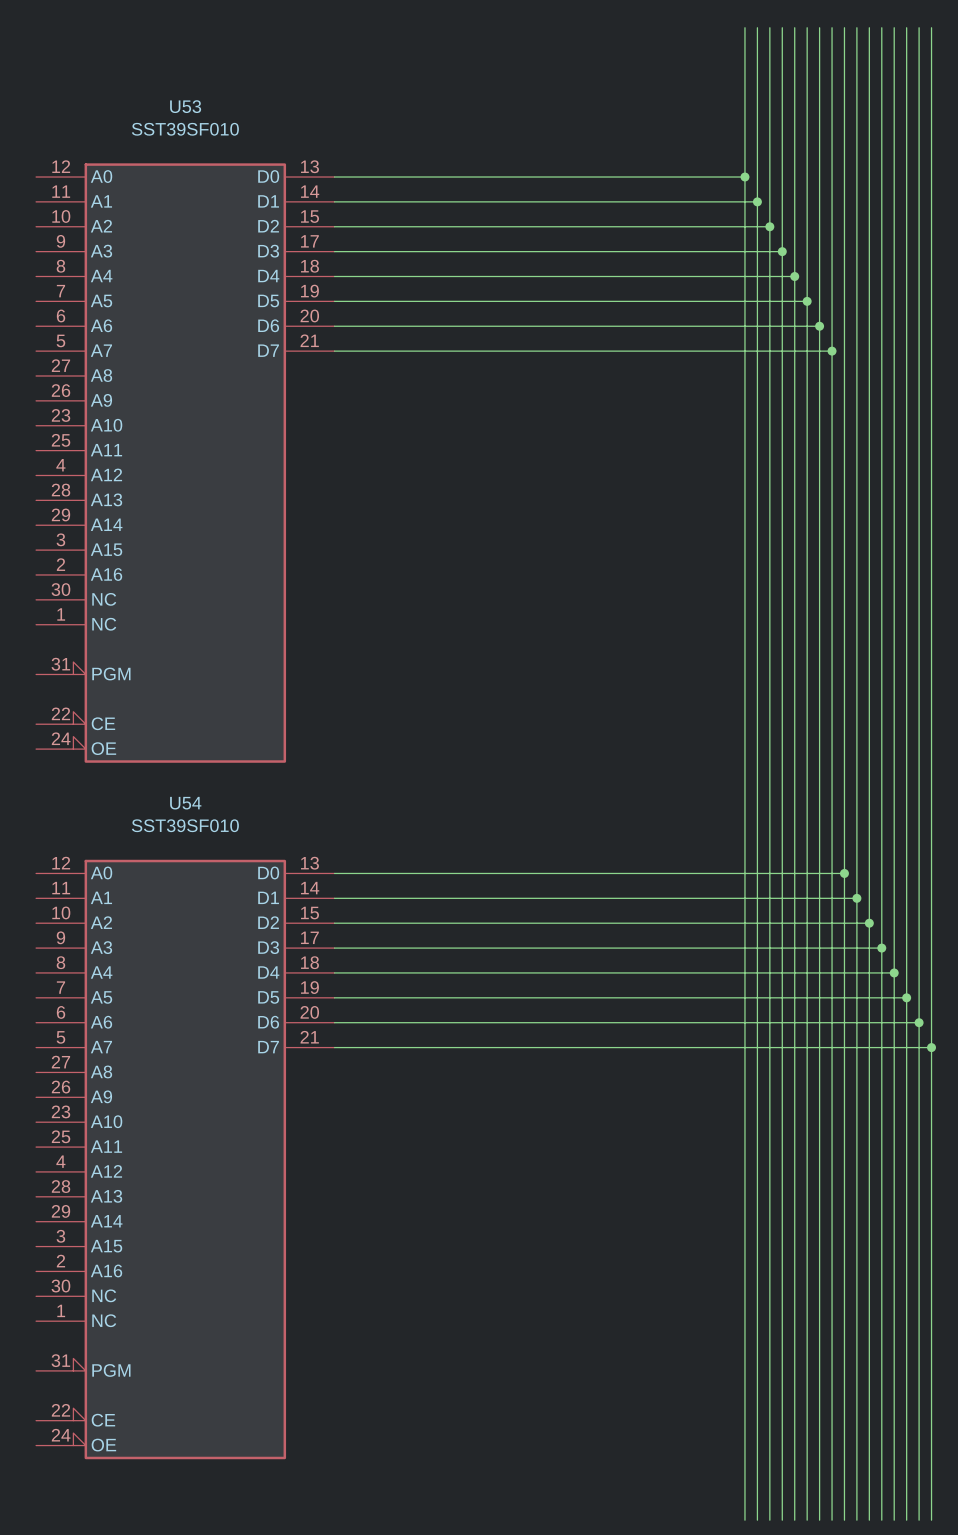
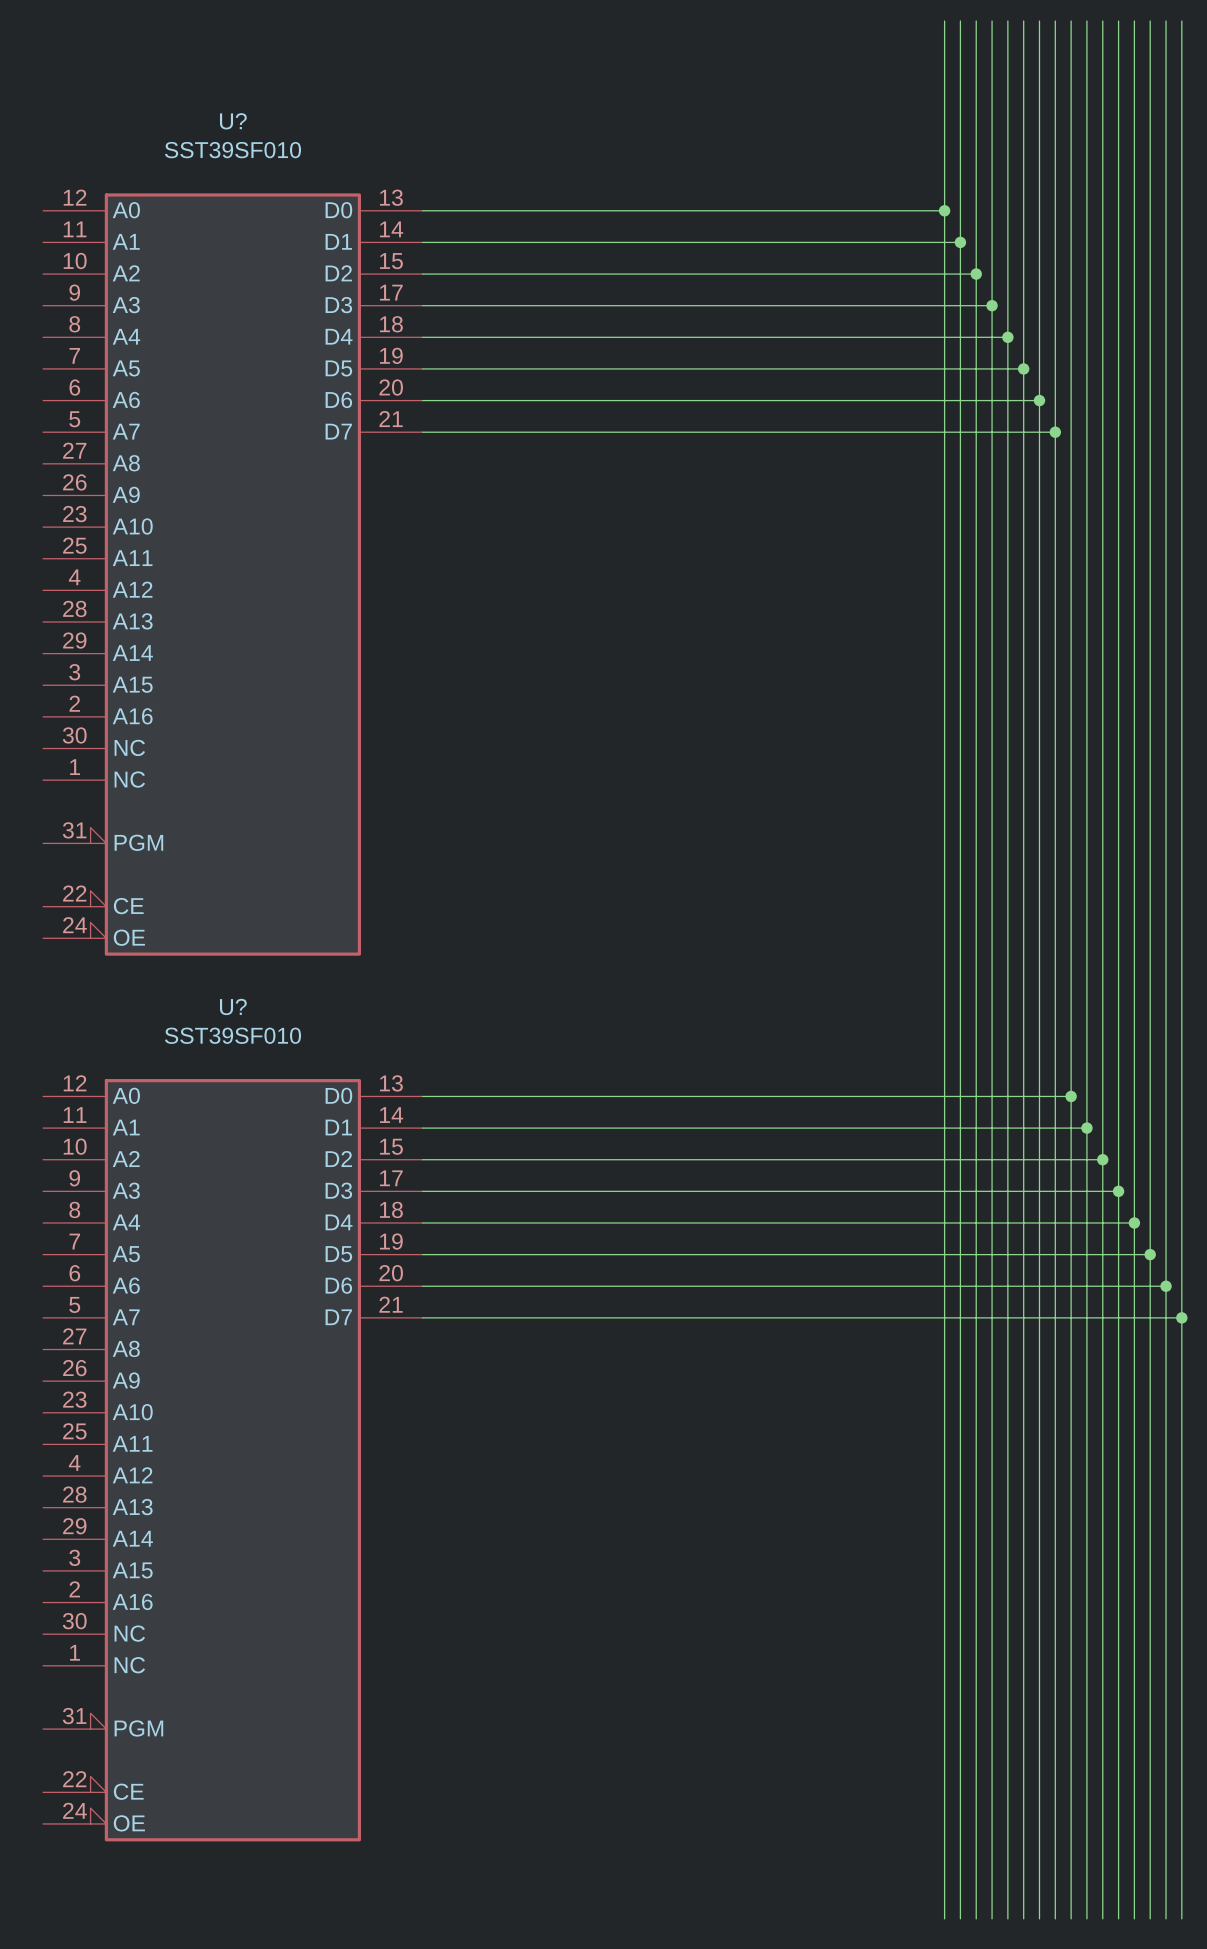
U53 name: U53 (185, 106) -> U? (233, 121)
U54 name: U54 (185, 803) -> U? (233, 1006)

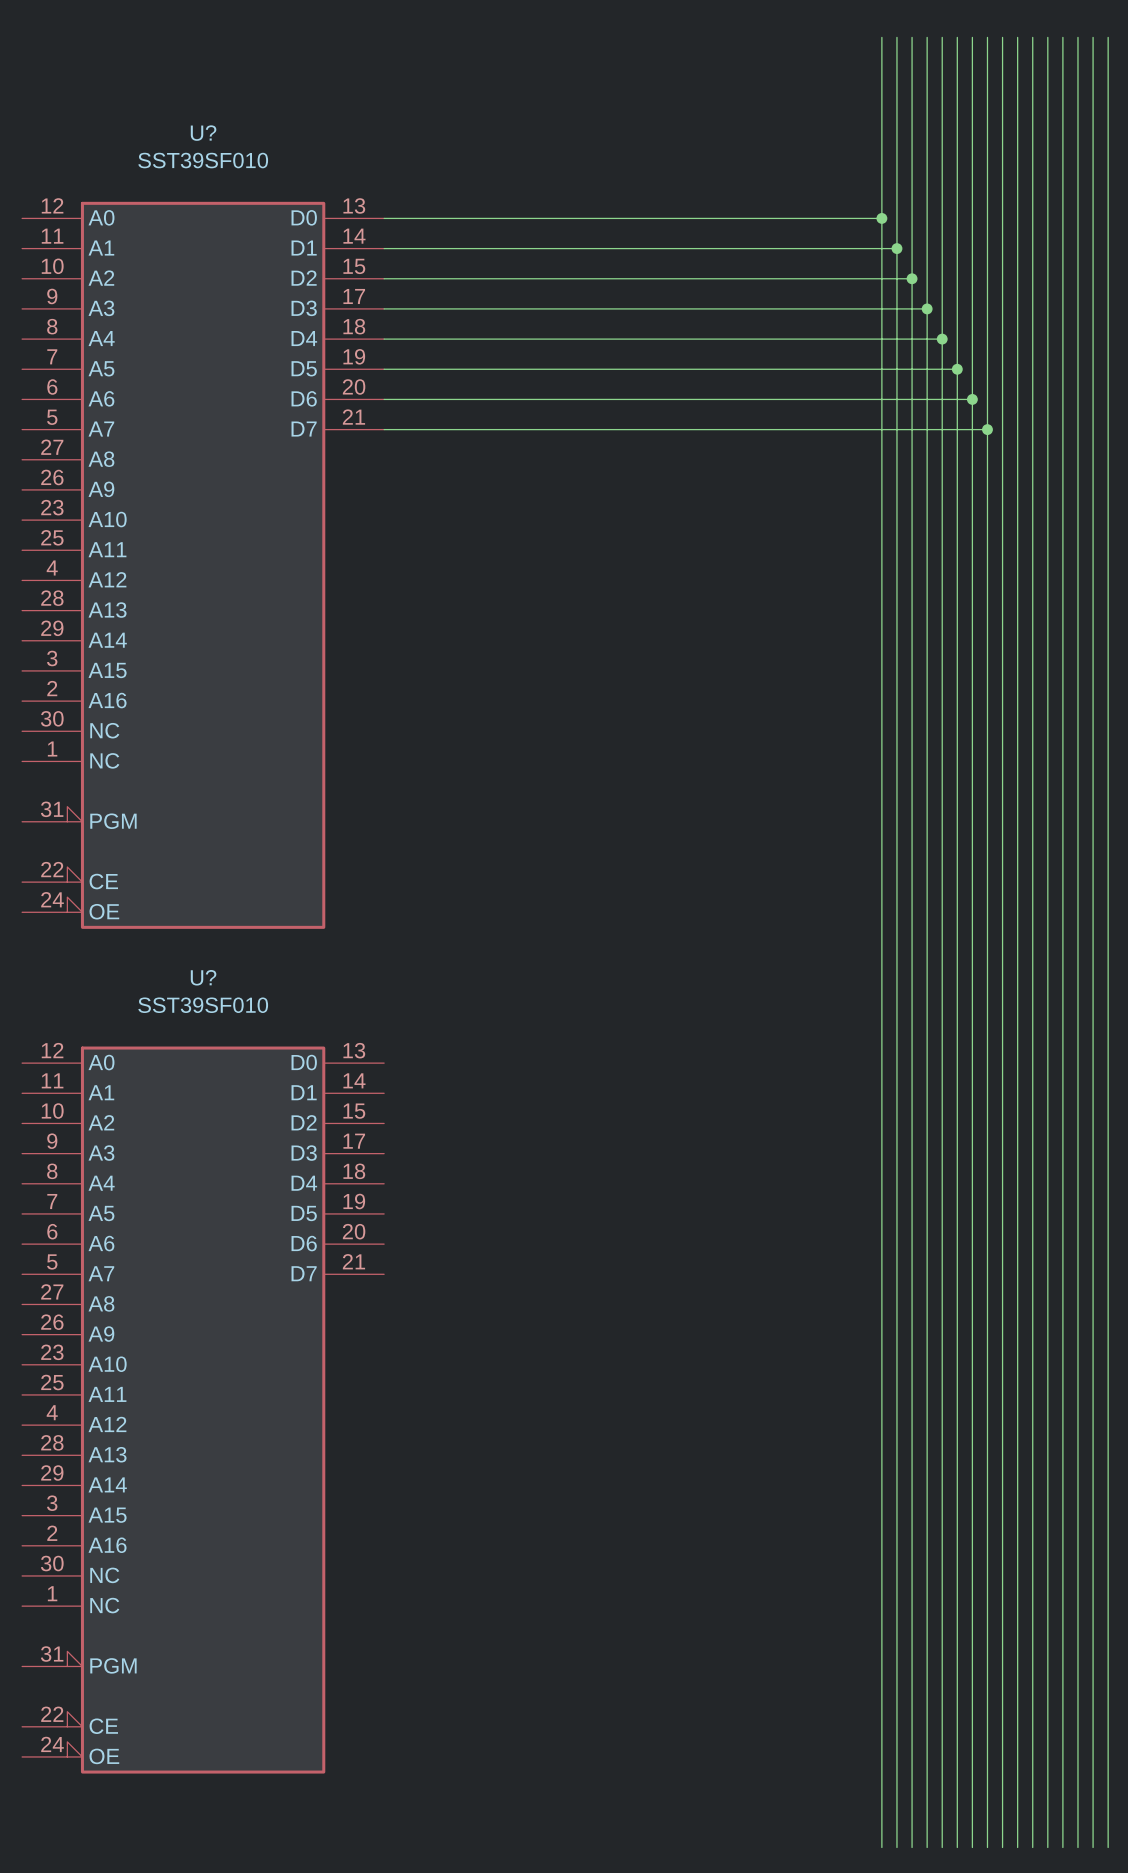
wire: (422, 1096) (1071, 1096) -> none
junction: (1071, 1096) -> none
wire: (422, 1128) (1086, 1128) -> none
junction: (1086, 1128) -> none
wire: (422, 1159) (1102, 1159) -> none
junction: (1102, 1159) -> none
wire: (422, 1191) (1118, 1191) -> none
junction: (1118, 1191) -> none
wire: (422, 1222) (1134, 1222) -> none
junction: (1134, 1222) -> none
wire: (422, 1254) (1150, 1254) -> none
junction: (1150, 1254) -> none
wire: (422, 1286) (1166, 1286) -> none
junction: (1166, 1286) -> none
wire: (422, 1317) (1181, 1317) -> none
junction: (1181, 1317) -> none

